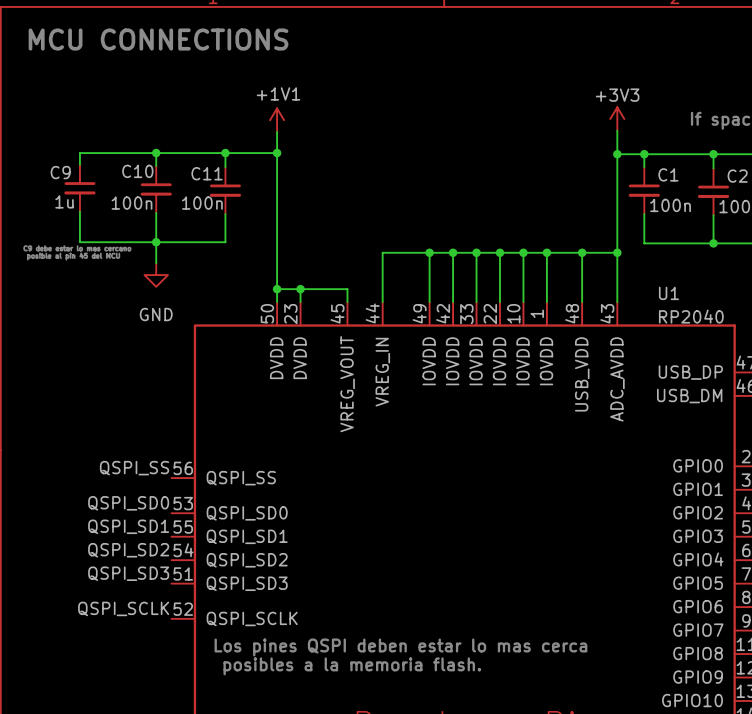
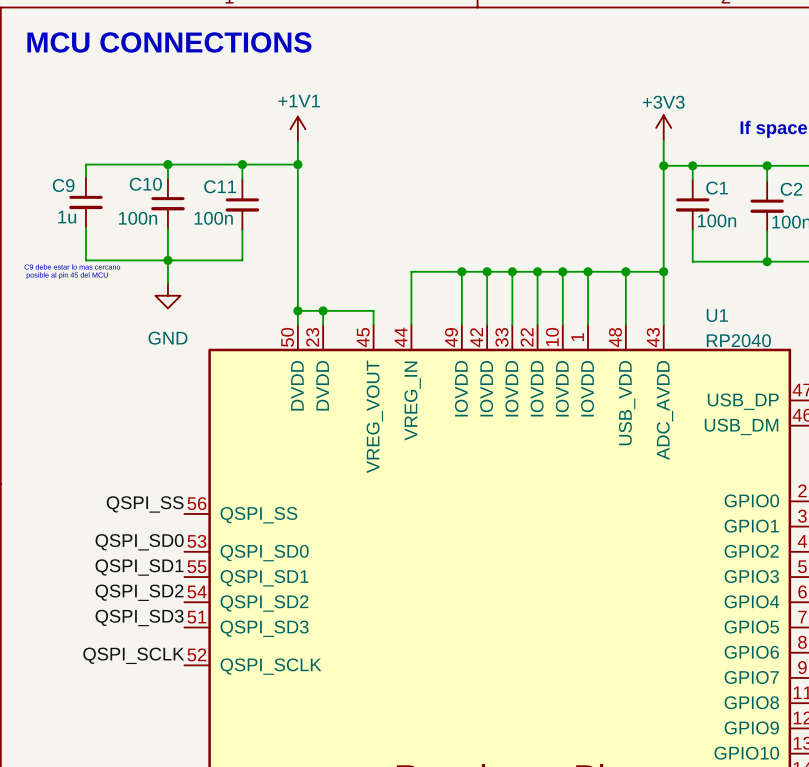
text: Los pines QSPI deben estar lo mas cerca (400, 647) -> none
text: posibles a la memoria flash. (352, 666) -> none

